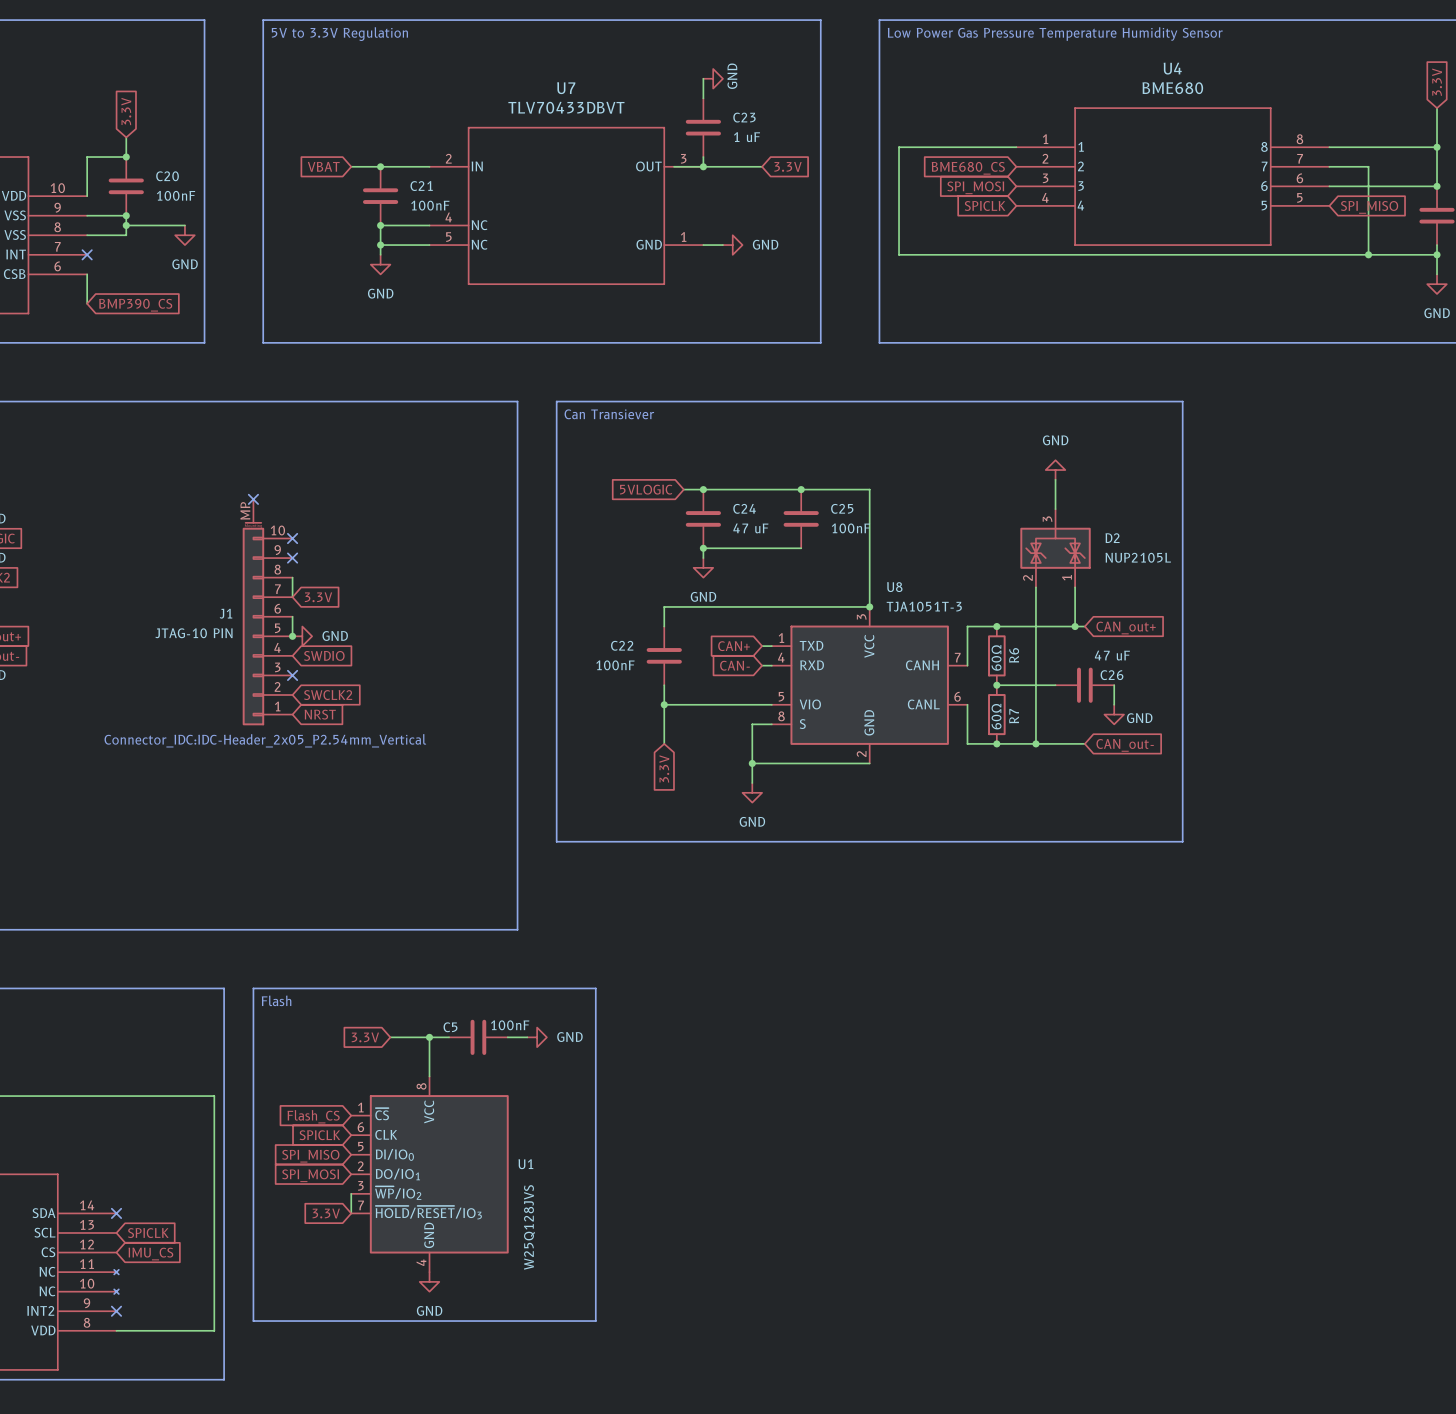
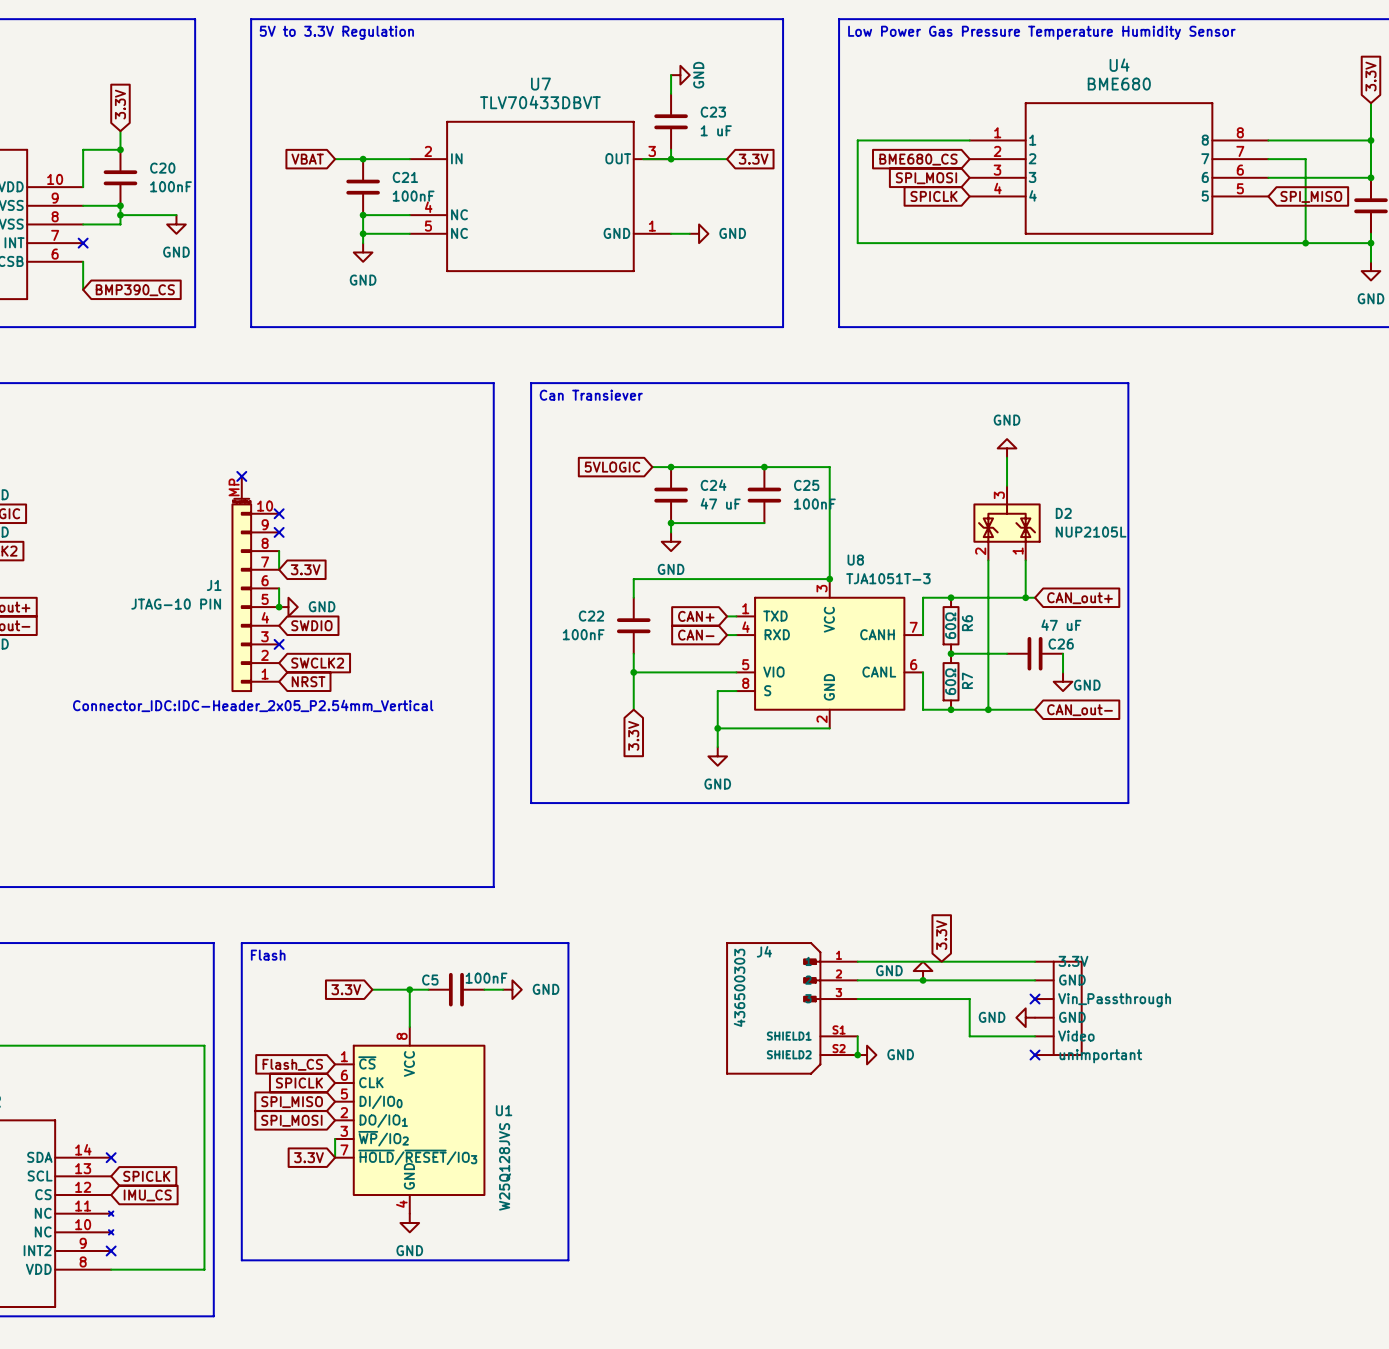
global label: none -> 3.3V (941, 935)
wire: none -> (857, 961) (1035, 961)
power symbol: none -> GND (923, 971)
wire: none -> (857, 980) (1035, 980)
junction: none -> (923, 980)
wire: none -> (857, 999) (969, 999) (969, 1036) (1035, 1036)
no-connect mark: none -> (1035, 999)
J4: none -> 436500303 (791, 1008)
part: none -> (1058, 1008)
power symbol: none -> GND (1025, 1017)
wire: none -> (857, 1036) (857, 1055)
junction: none -> (857, 1055)
power symbol: none -> GND (867, 1055)
no-connect mark: none -> (1035, 1055)

